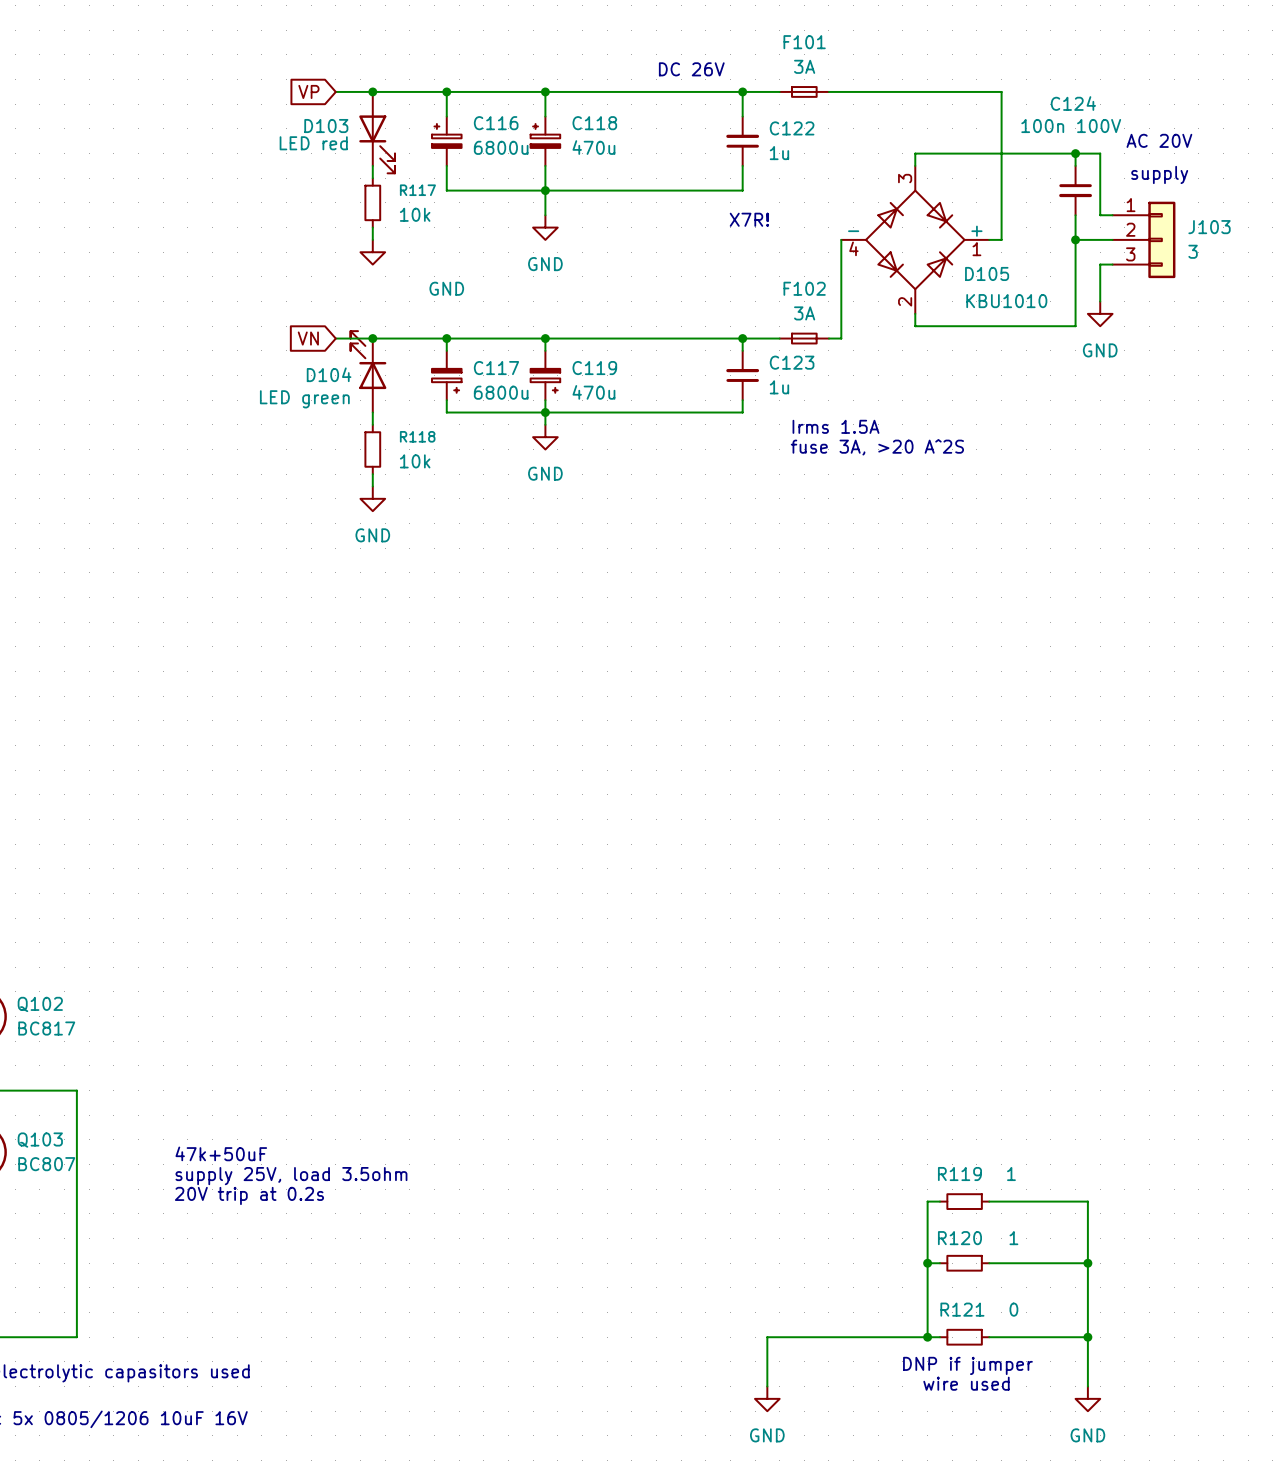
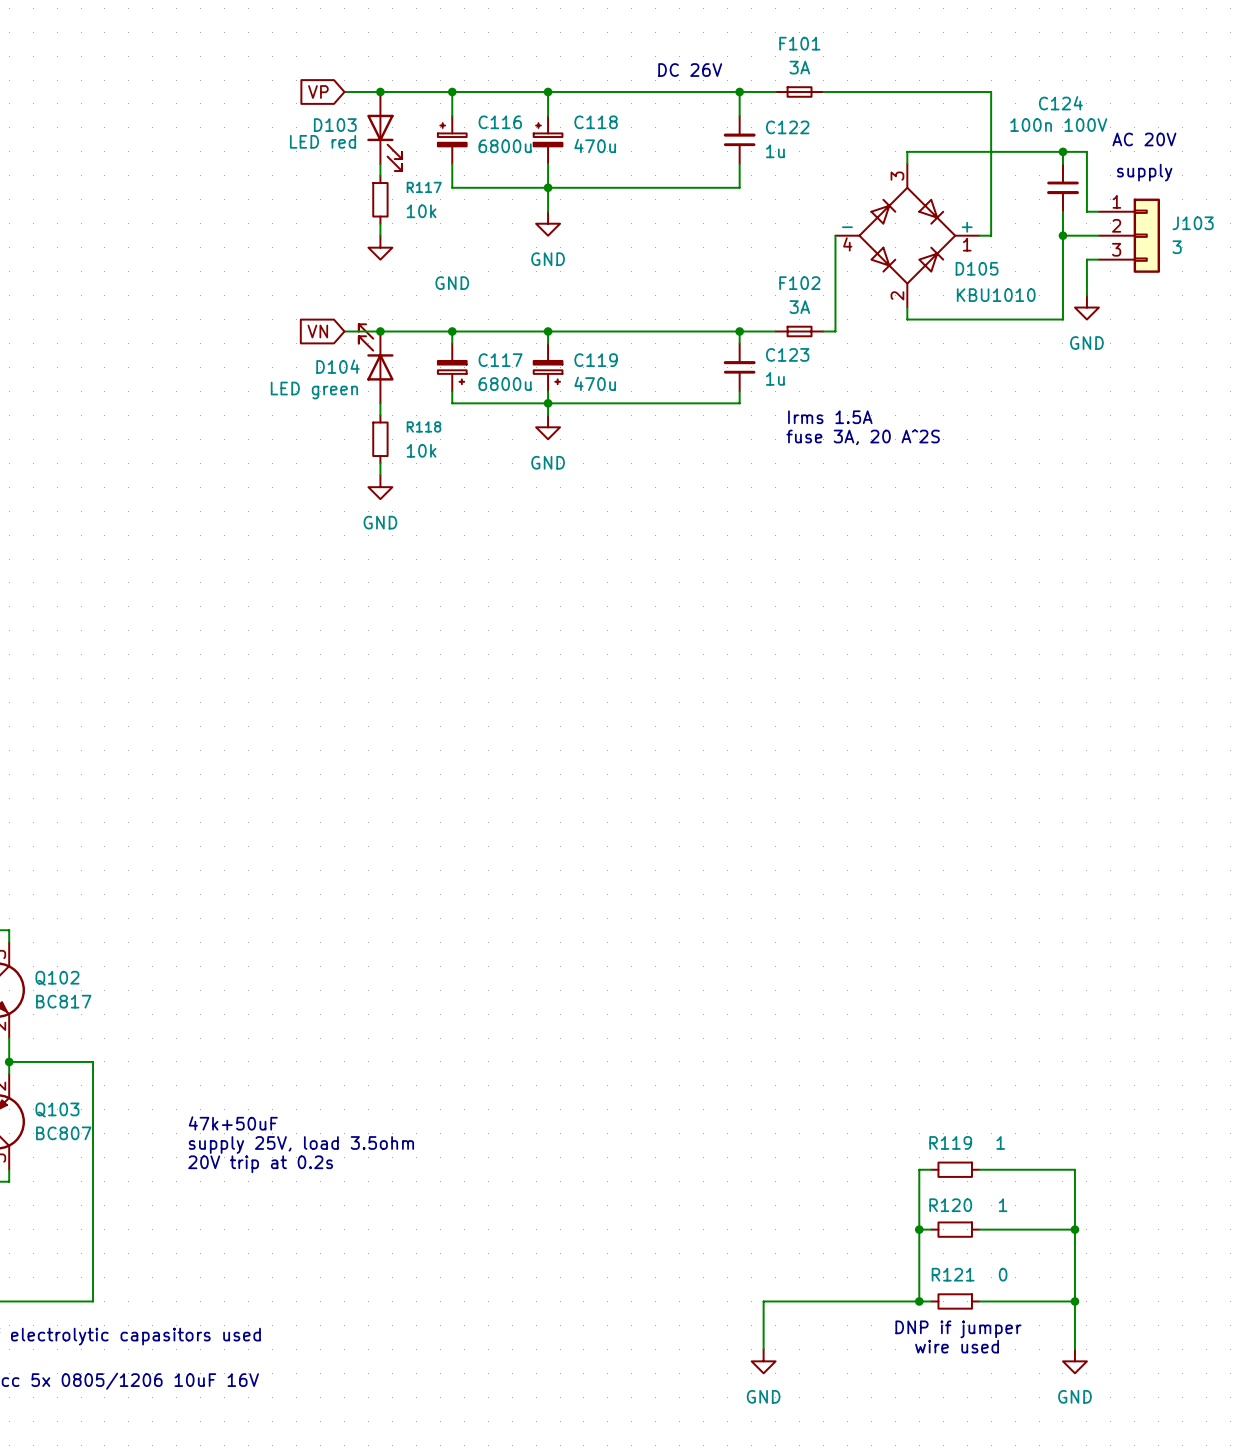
text: X7R! (749, 219) -> none
text: fuse 3A, >20 A^2S (877, 447) -> fuse 3A, 20 A^2S (863, 437)

